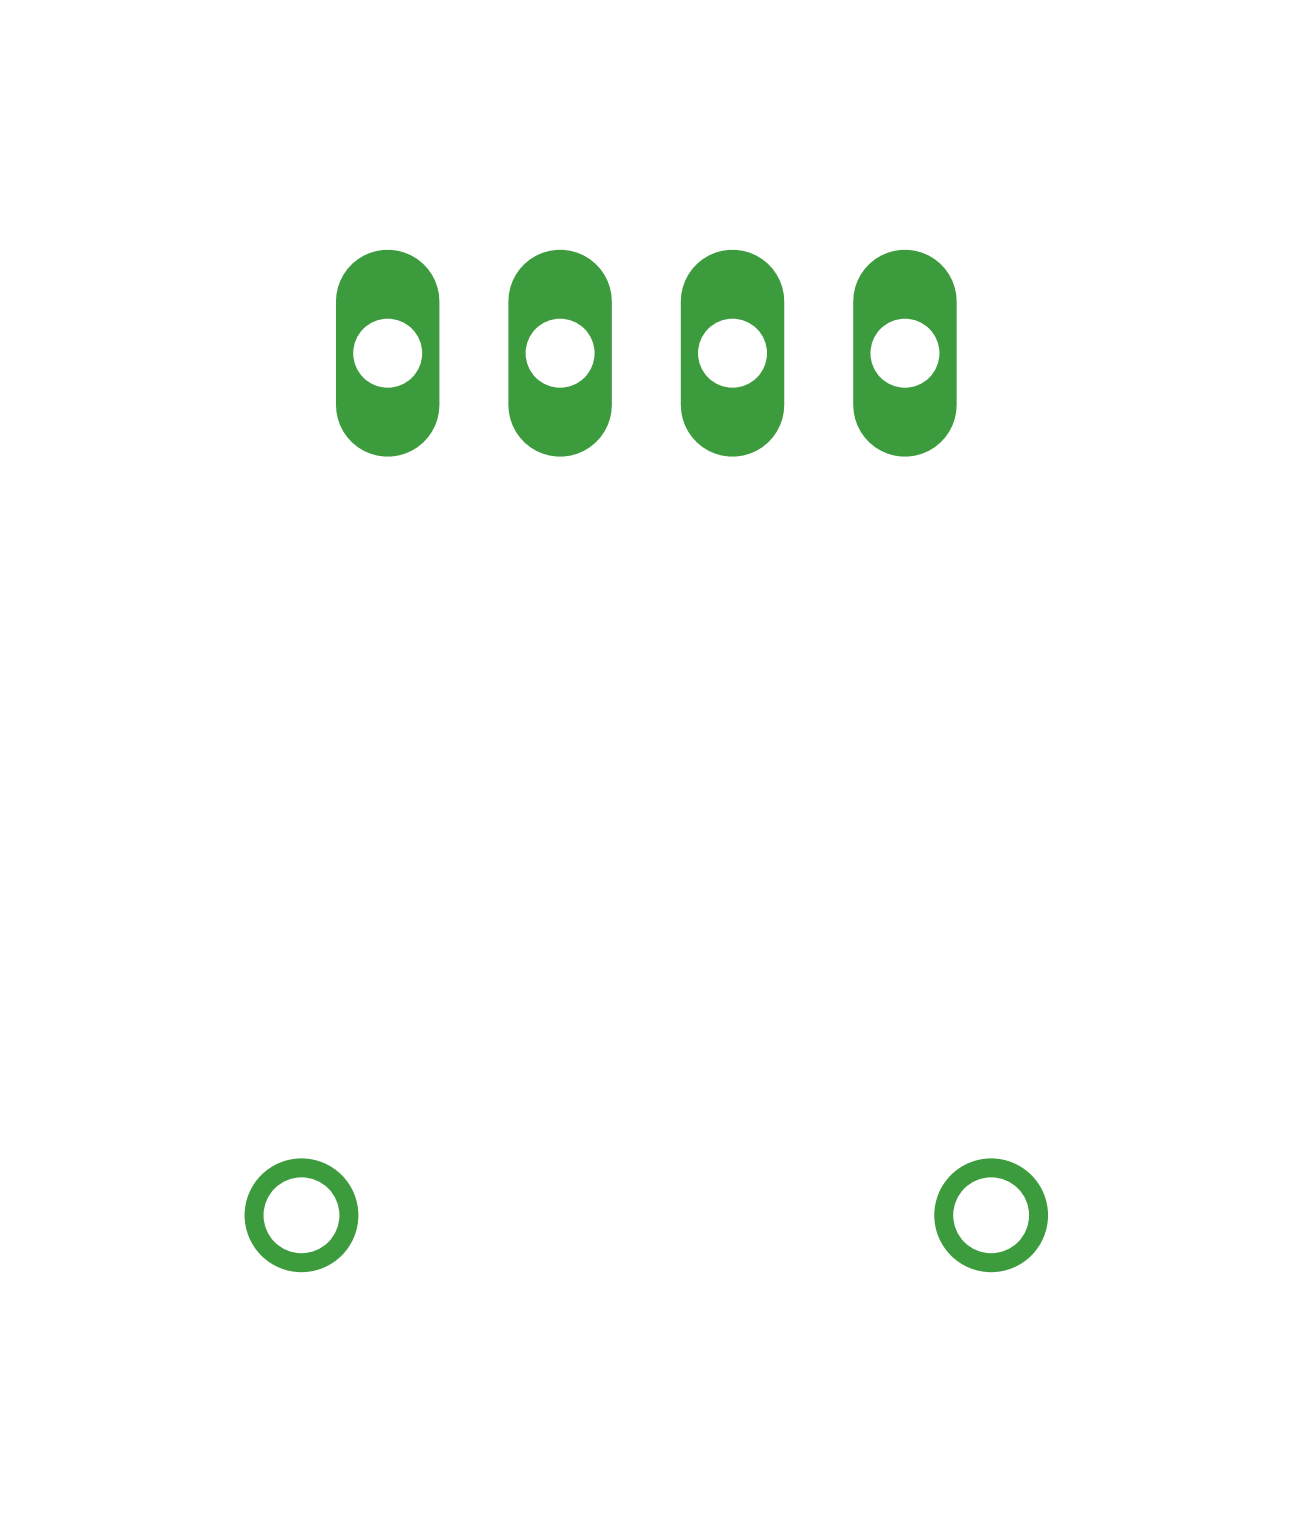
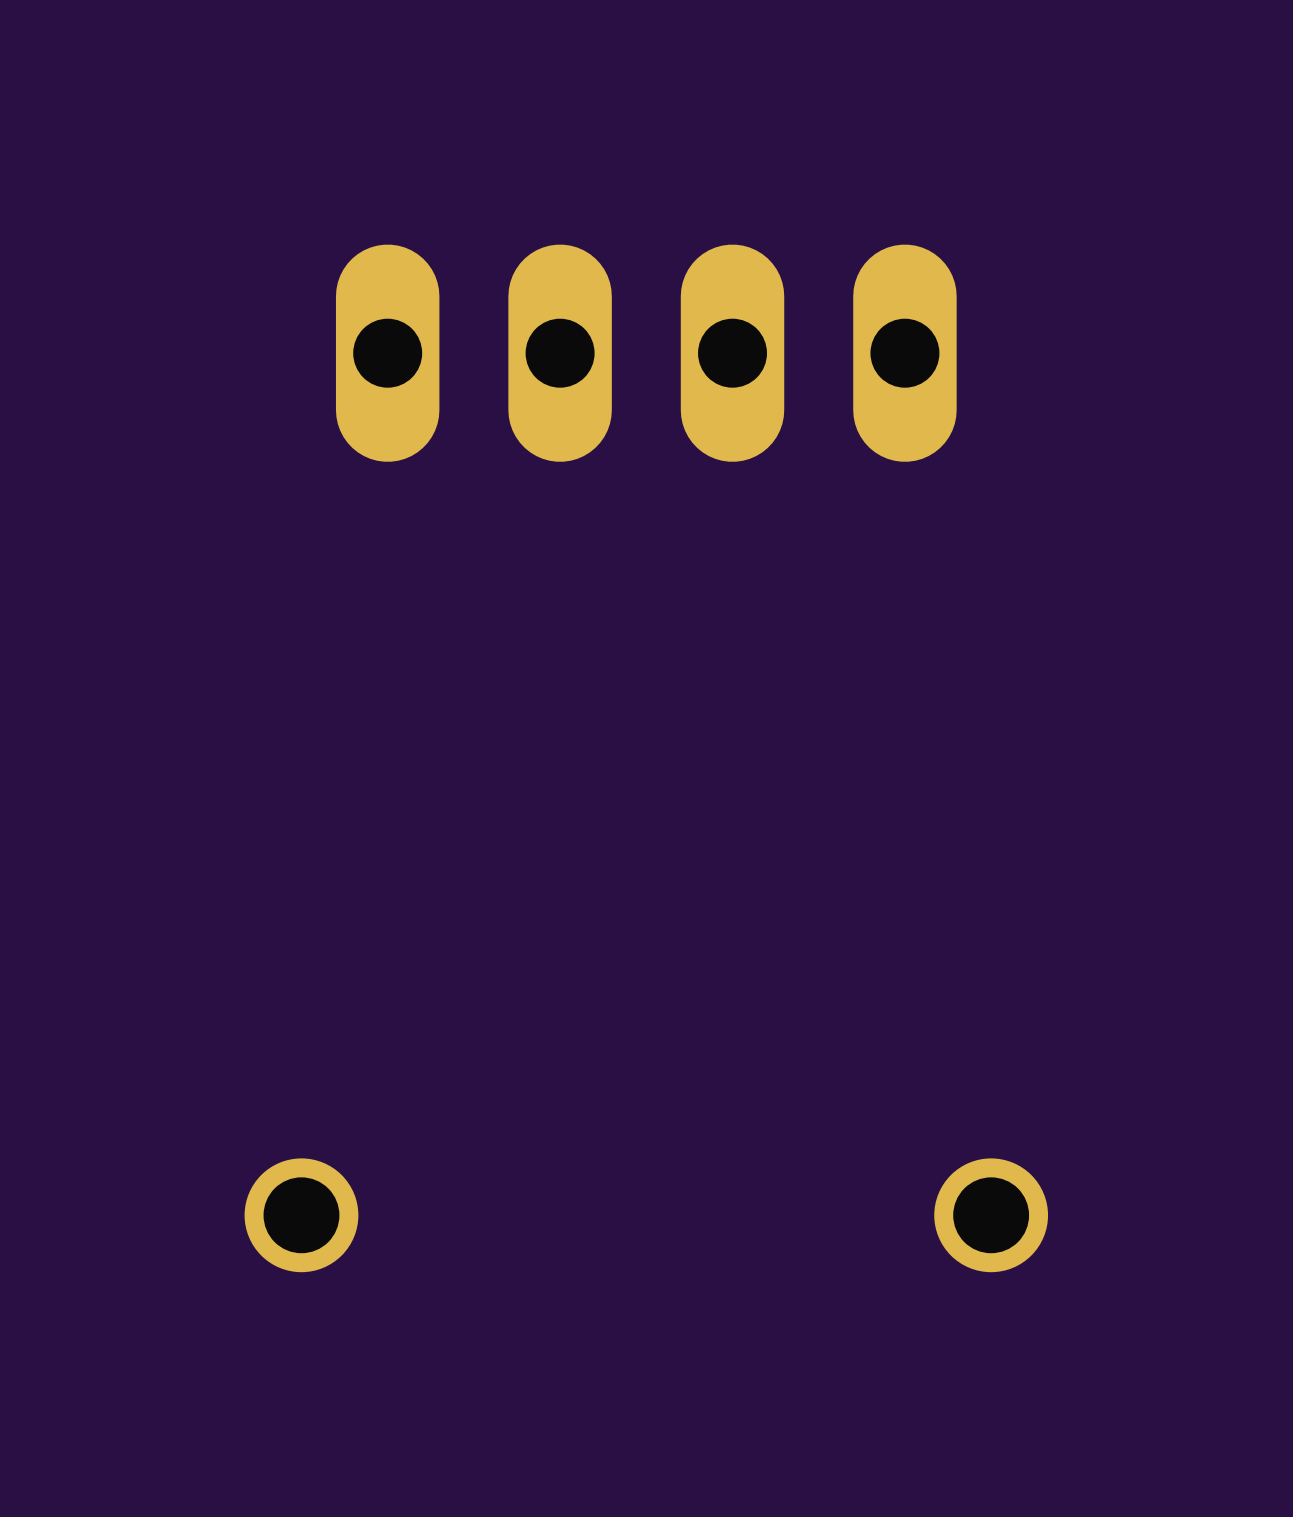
part footprint: [335, 249, 957, 457] -> [335, 244, 957, 462]

